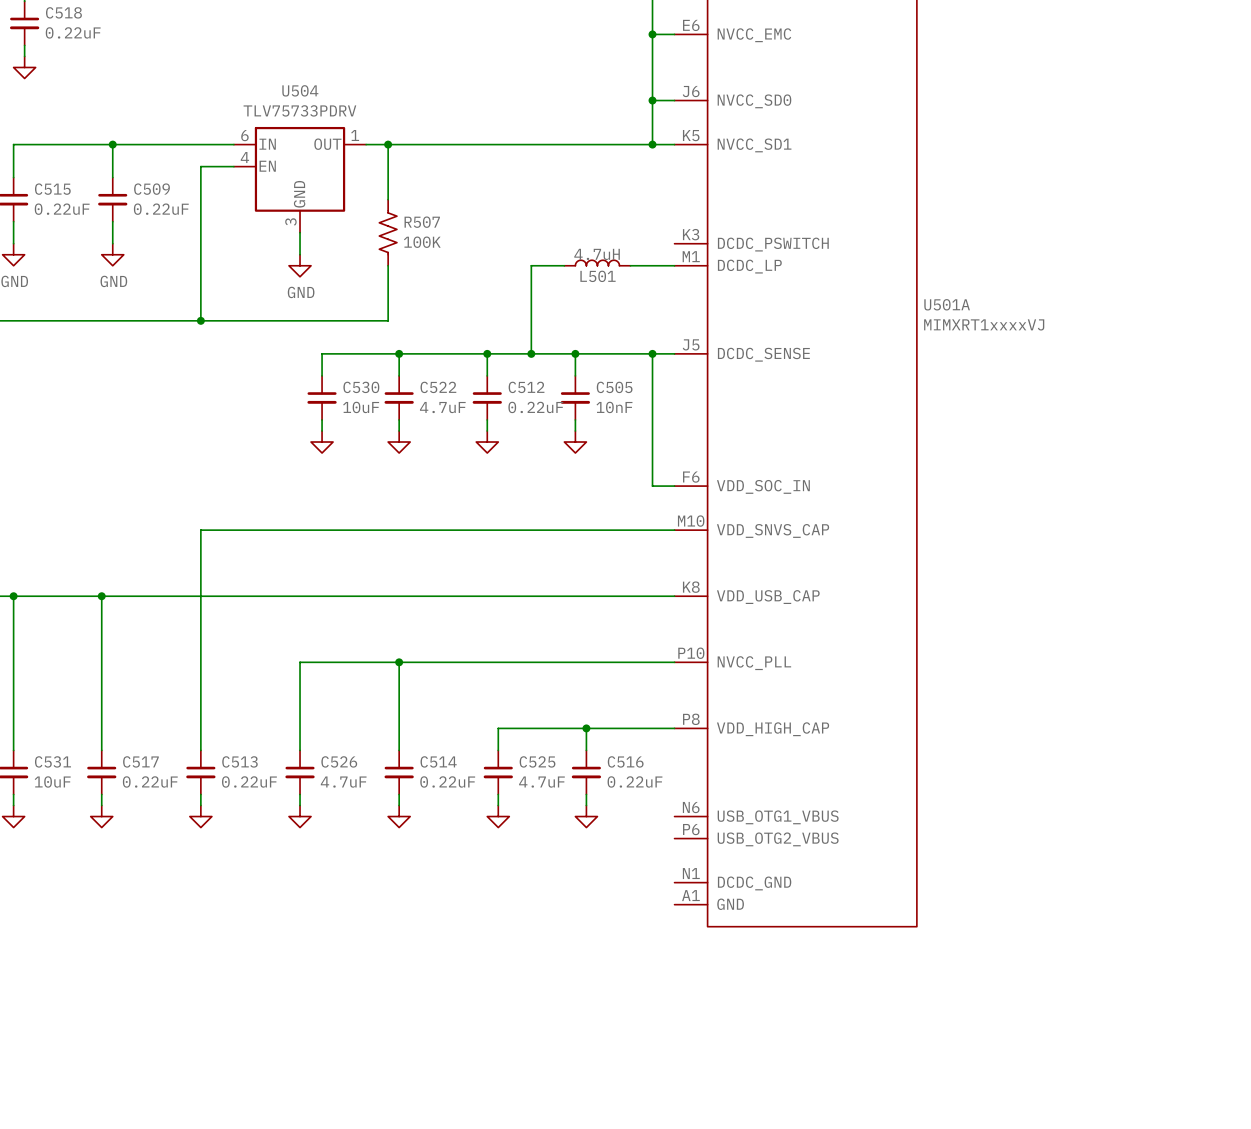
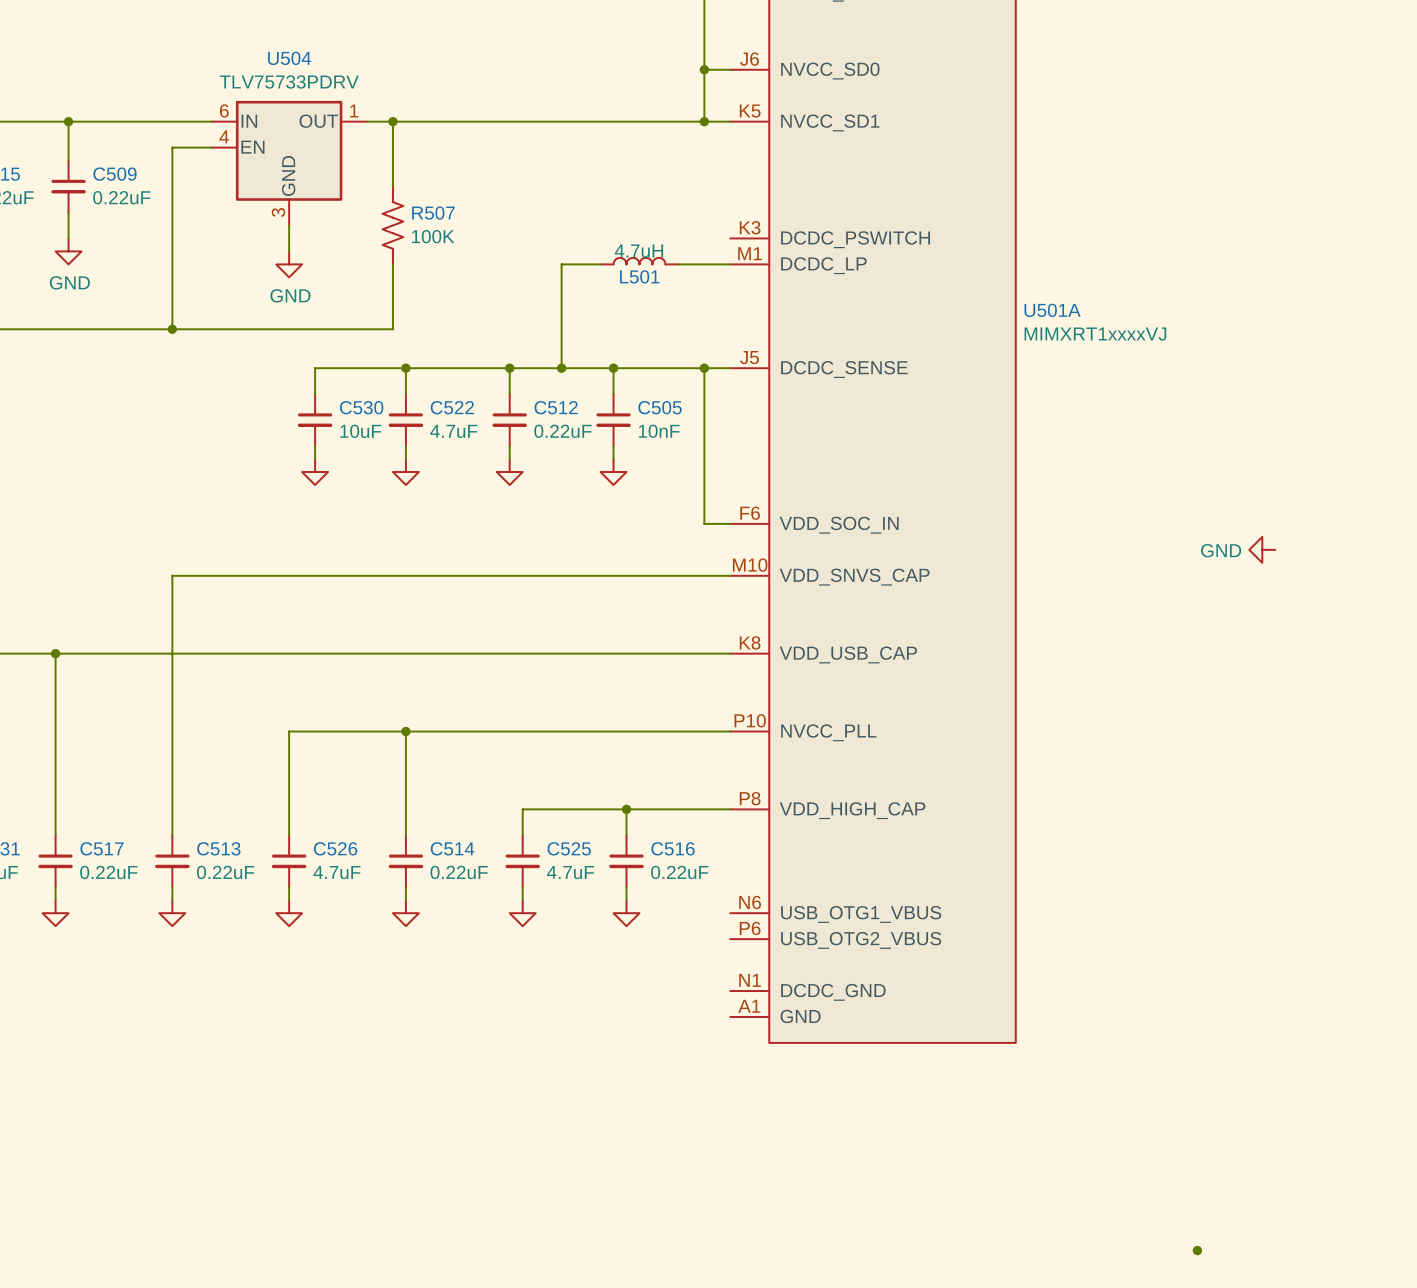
power symbol: none -> GND (1262, 549)
junction: none -> (1197, 1250)

